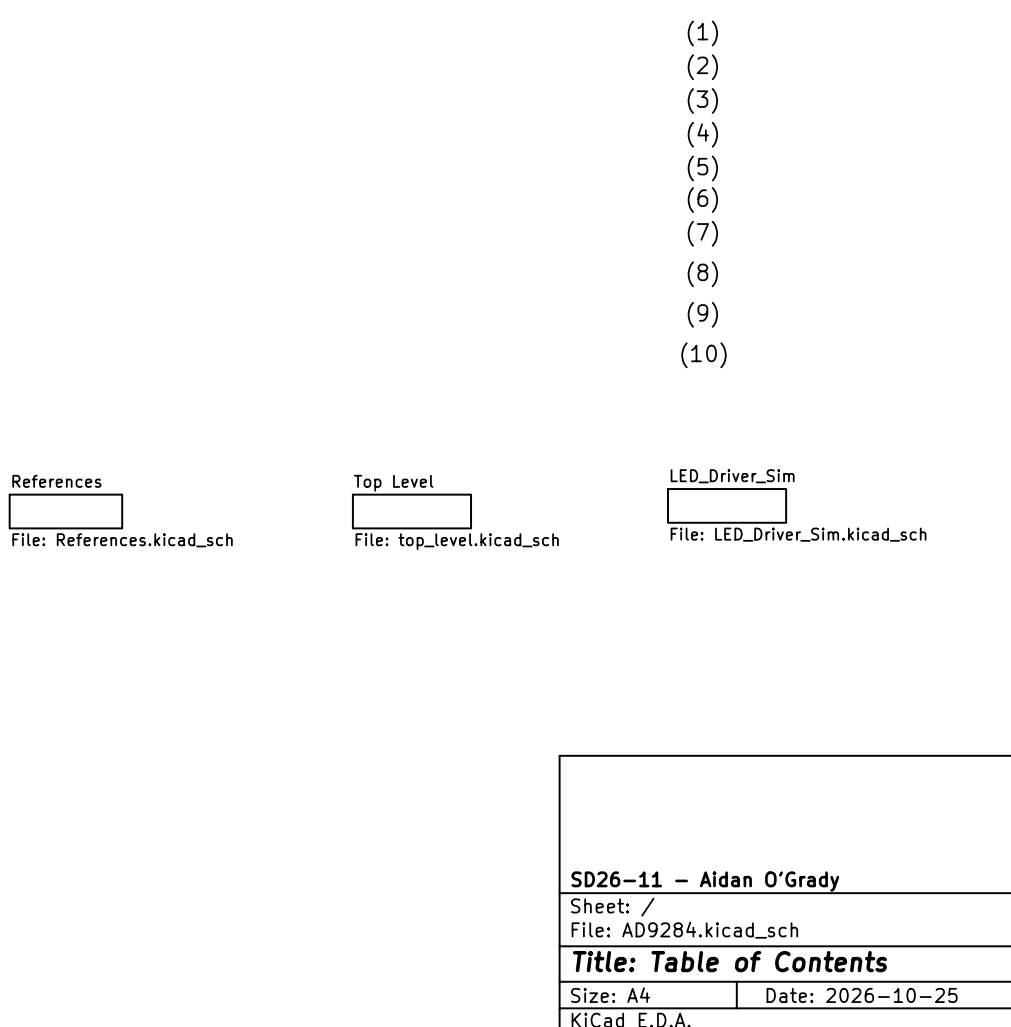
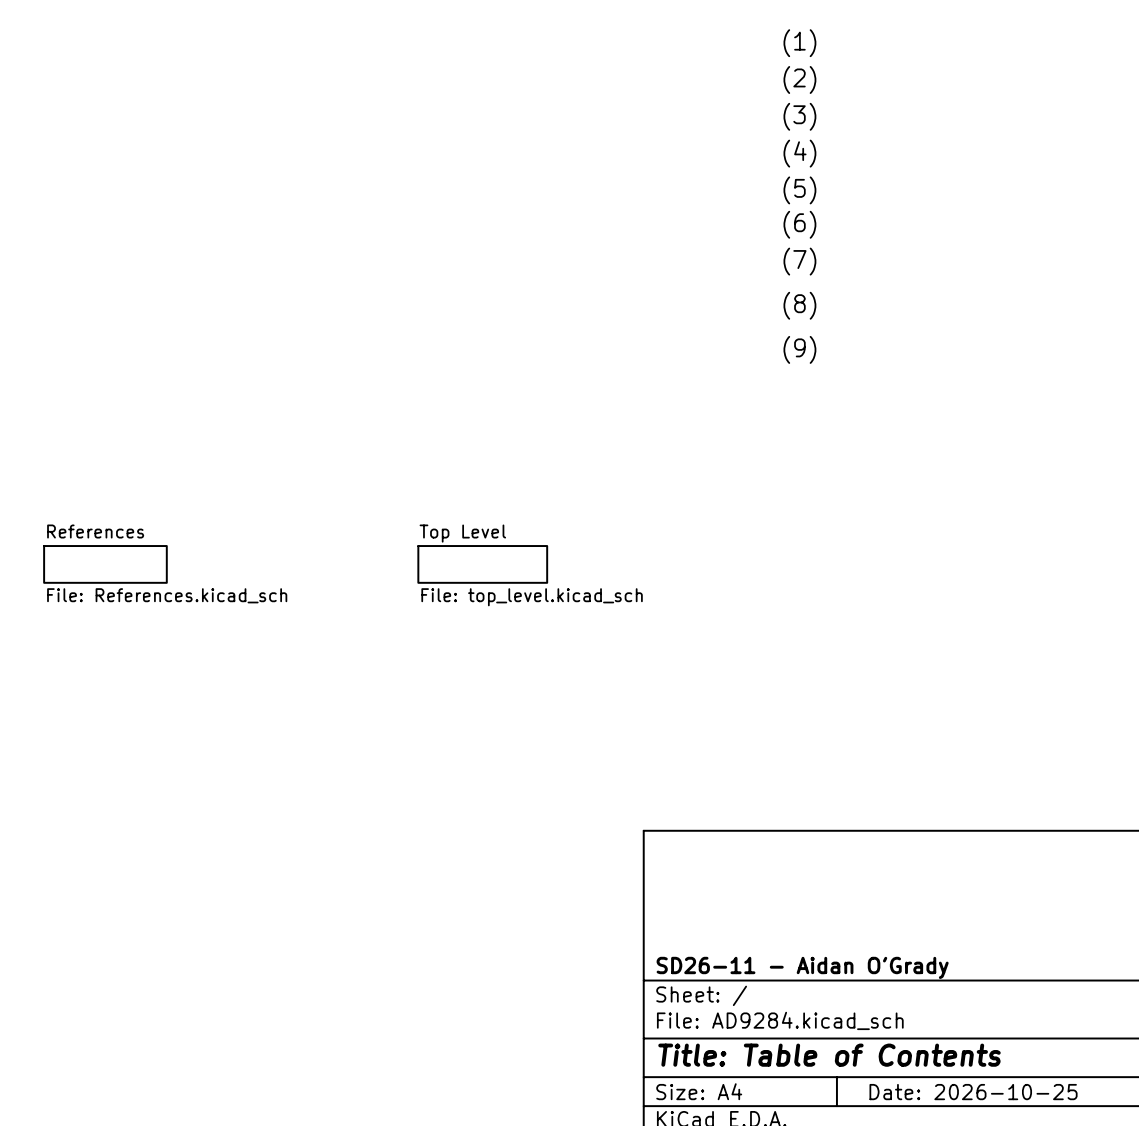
text: (10) (703, 355) -> none
sheet LED_Driver_Sim: File: LED_Driver_Sim.kicad_sch (727, 505) -> none

